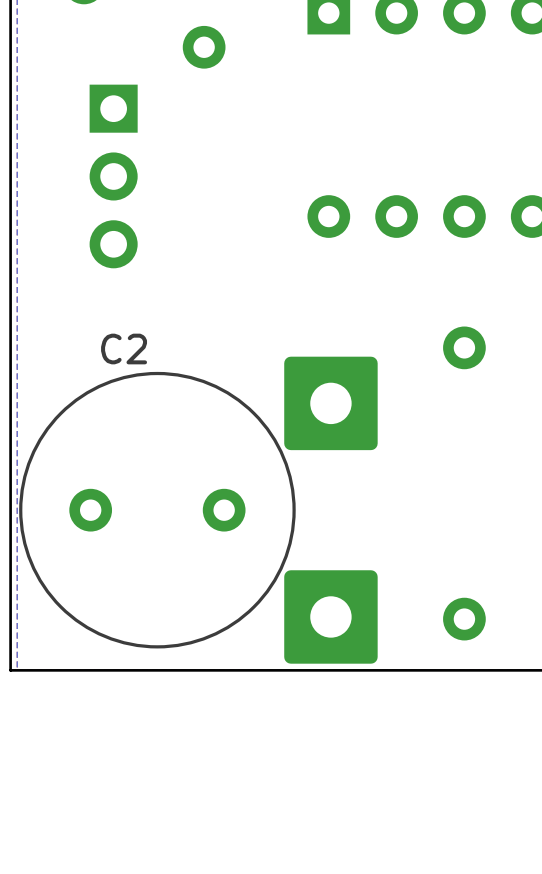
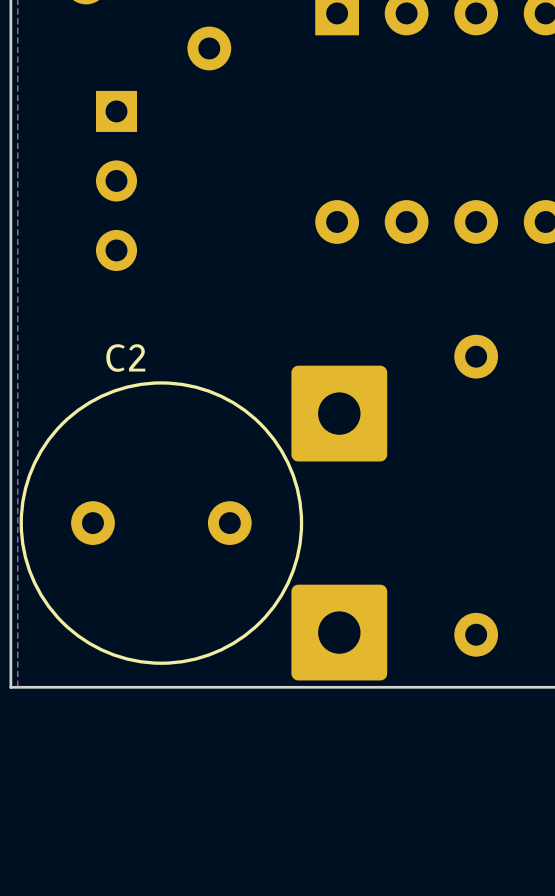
part footprint: [89, 84, 138, 269] -> [95, 90, 138, 271]

